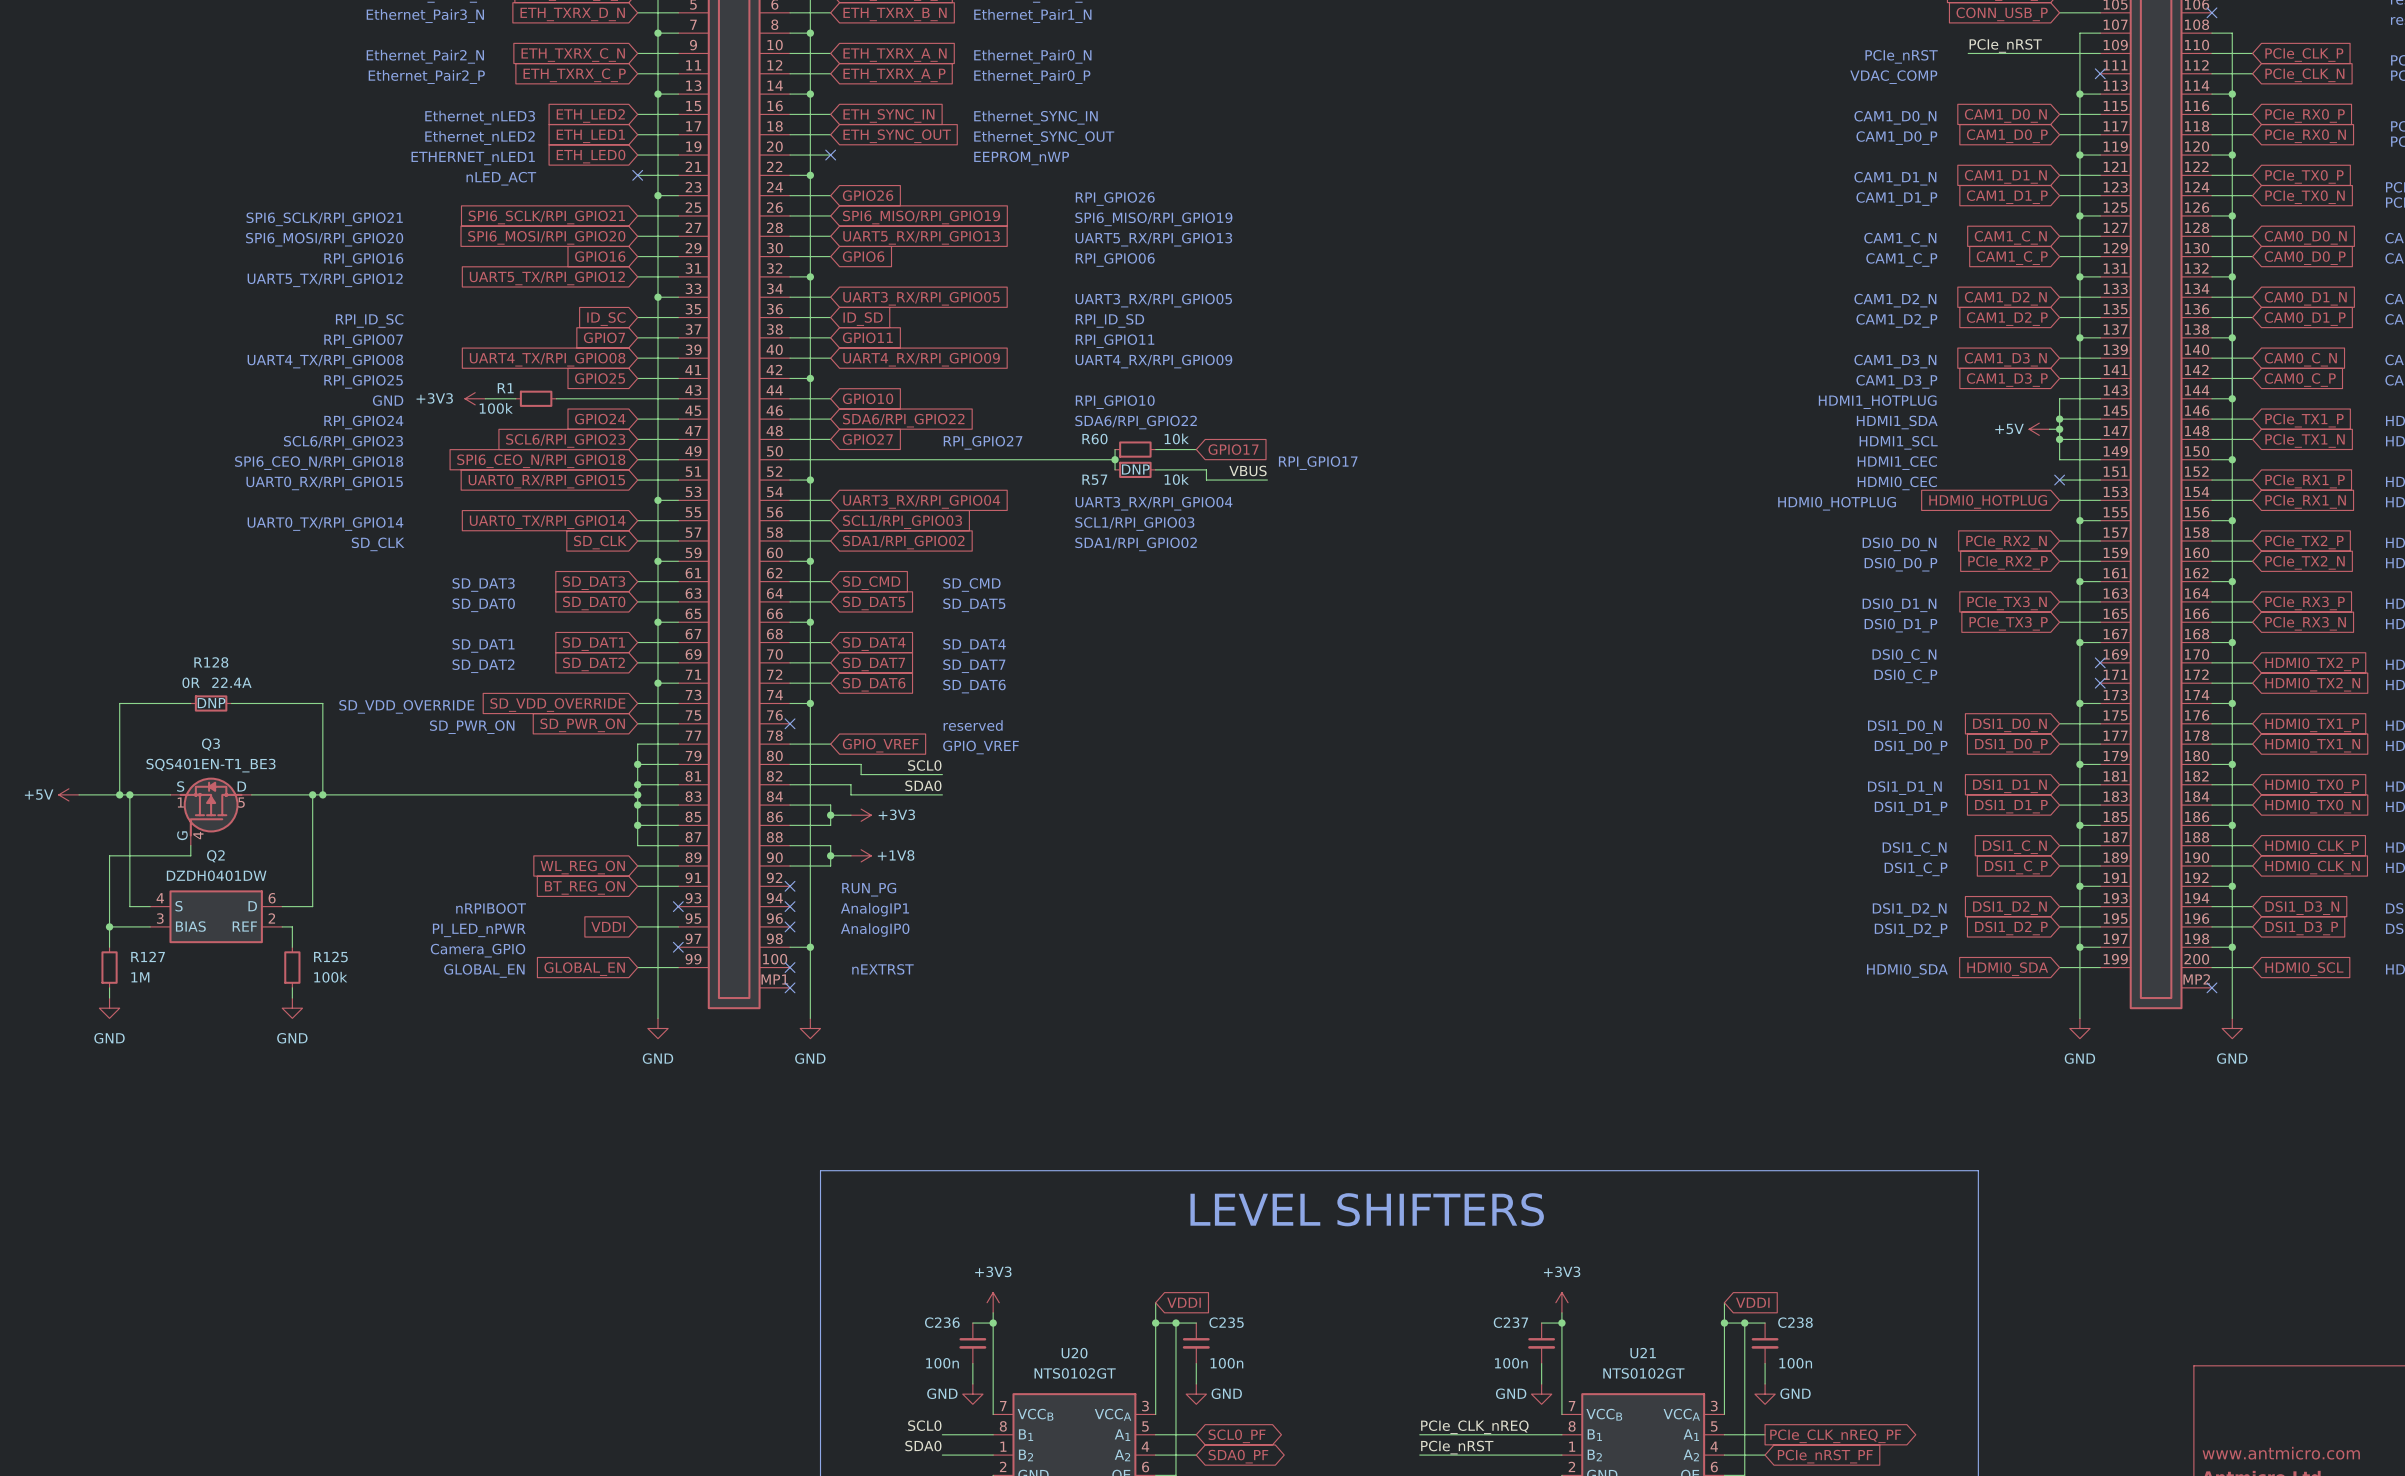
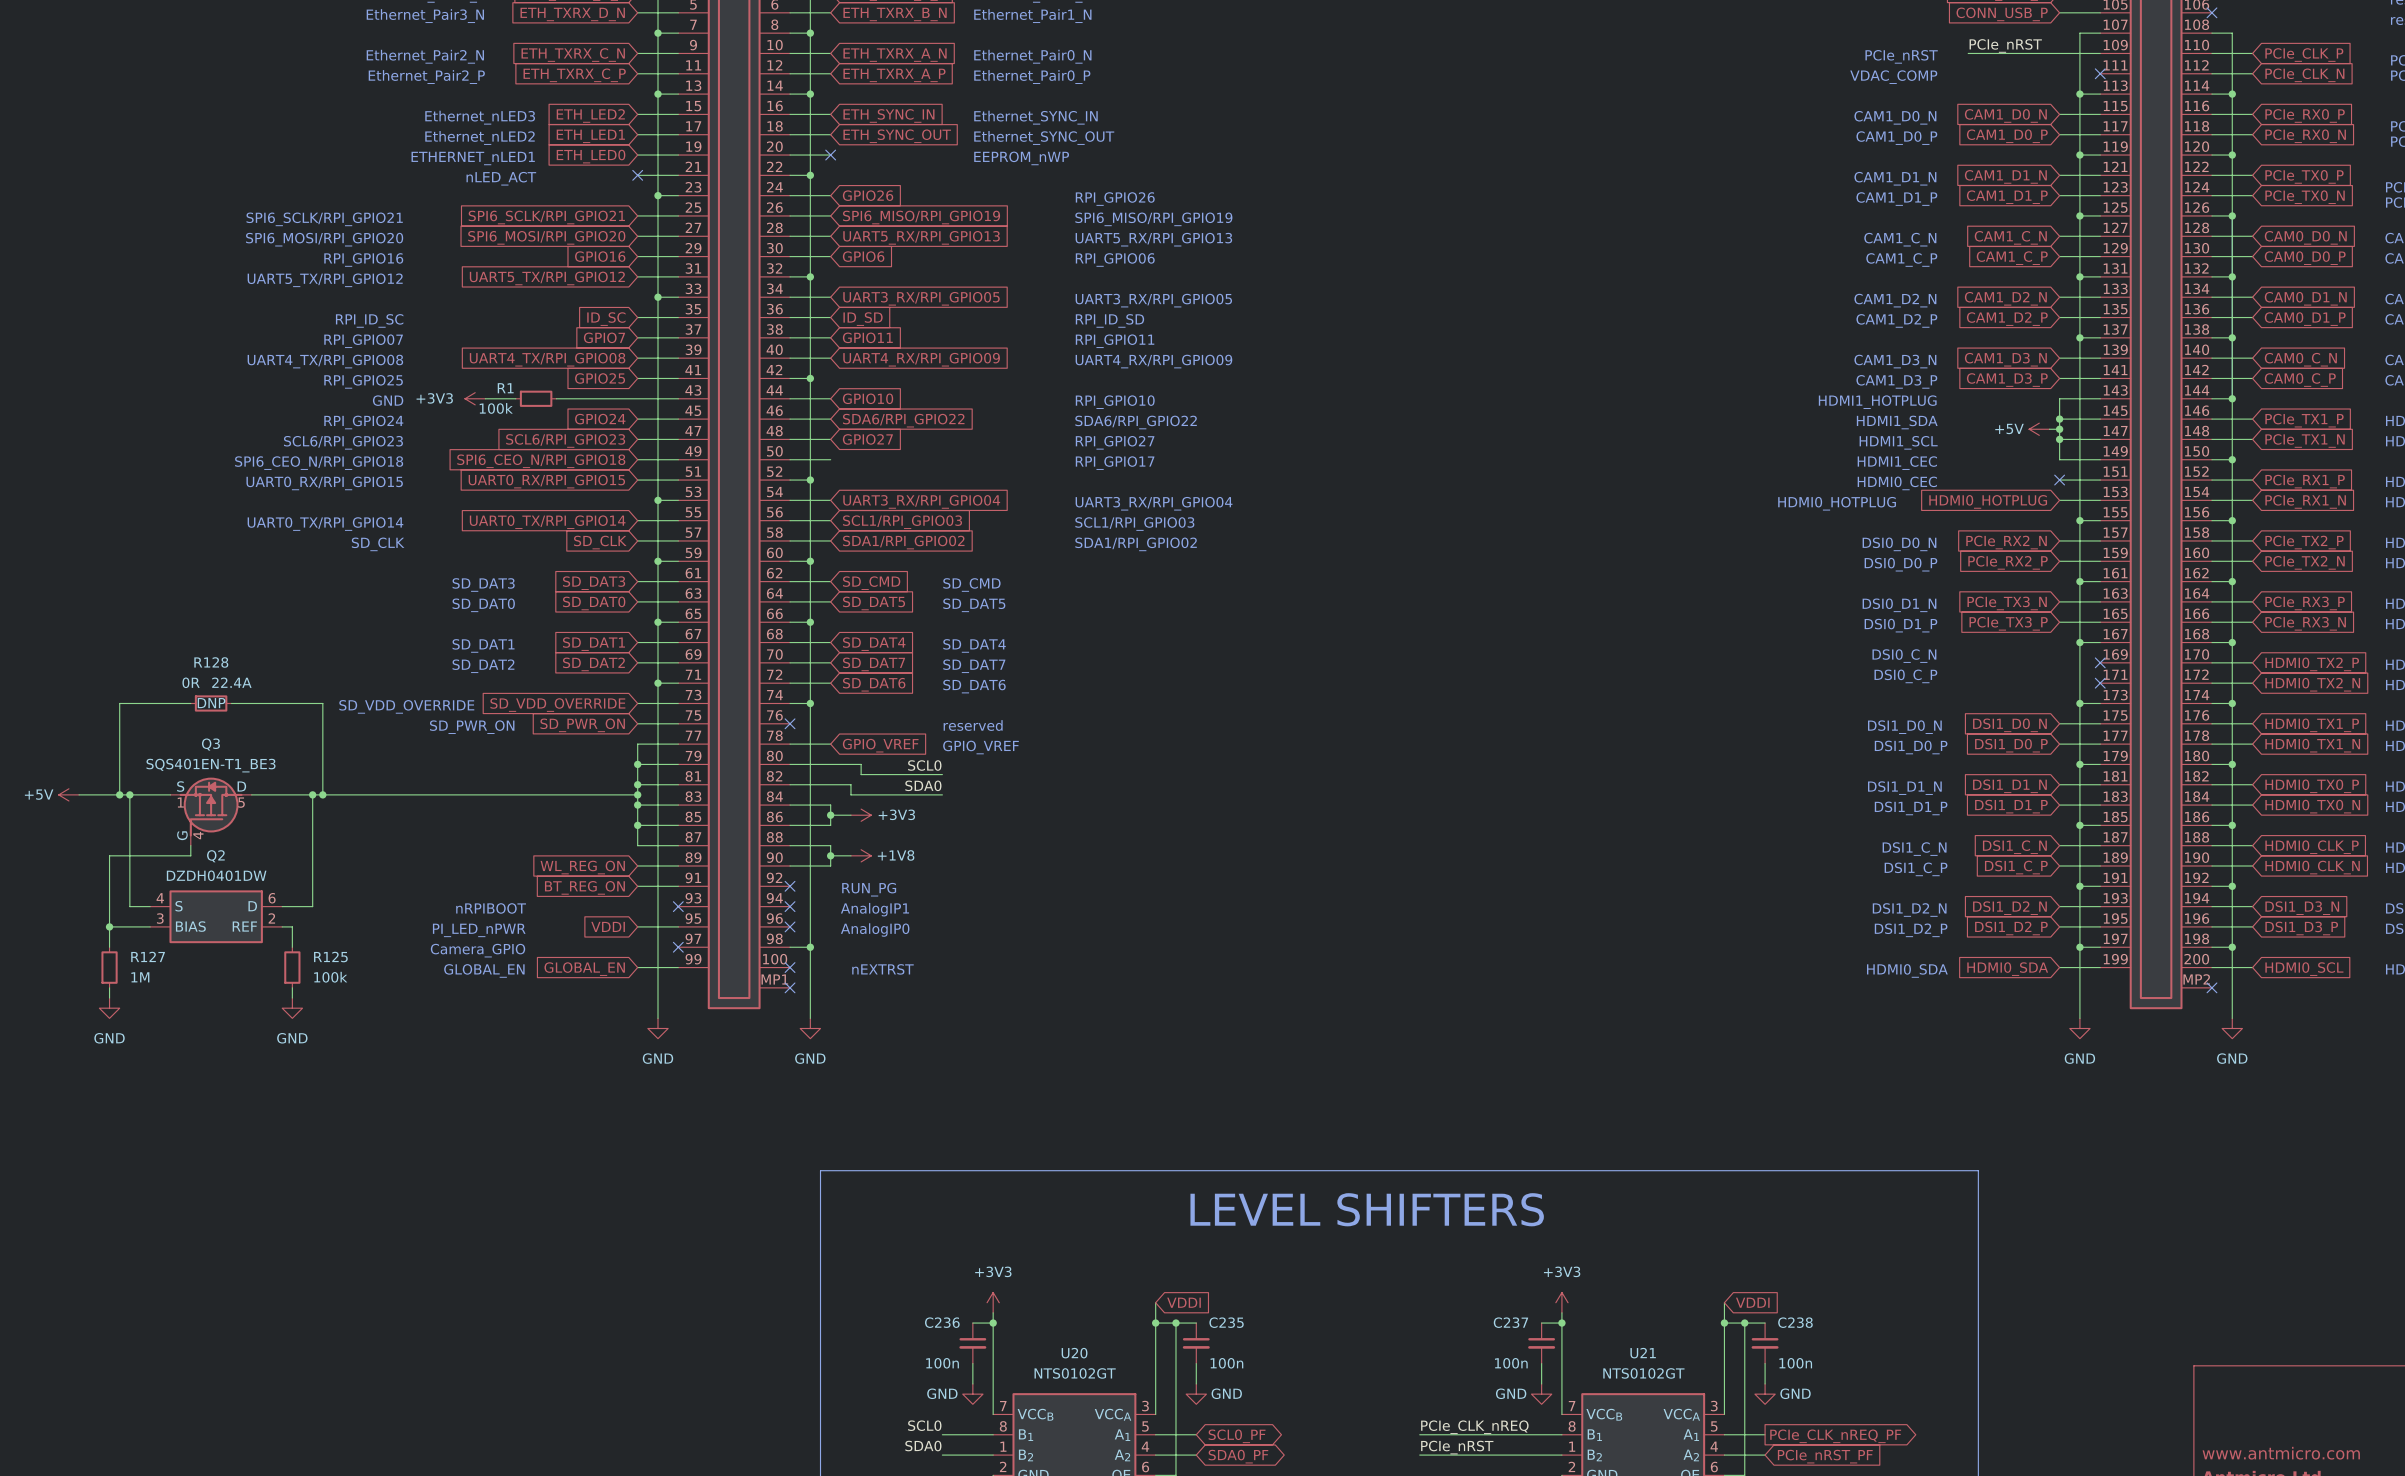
text position: RPI_GPIO27 (983, 442) -> RPI_GPIO27 (1115, 442)
wire: (1115, 449) (1115, 469) -> none
R60: (1135, 449) -> none
wire: (1155, 449) (1196, 449) -> none
global label: GPIO17 (1233, 449) -> none
wire: (830, 459) (1115, 459) -> none
junction: (1115, 459) -> none
text: none -> RPI_GPIO17 (1115, 463)
text: RPI_GPIO17 (1318, 463) -> none
R57: (1135, 469) -> none
wire: (1155, 469) (1206, 469) (1206, 480) (1267, 480) -> none
label: VBUS (1248, 470) -> none

